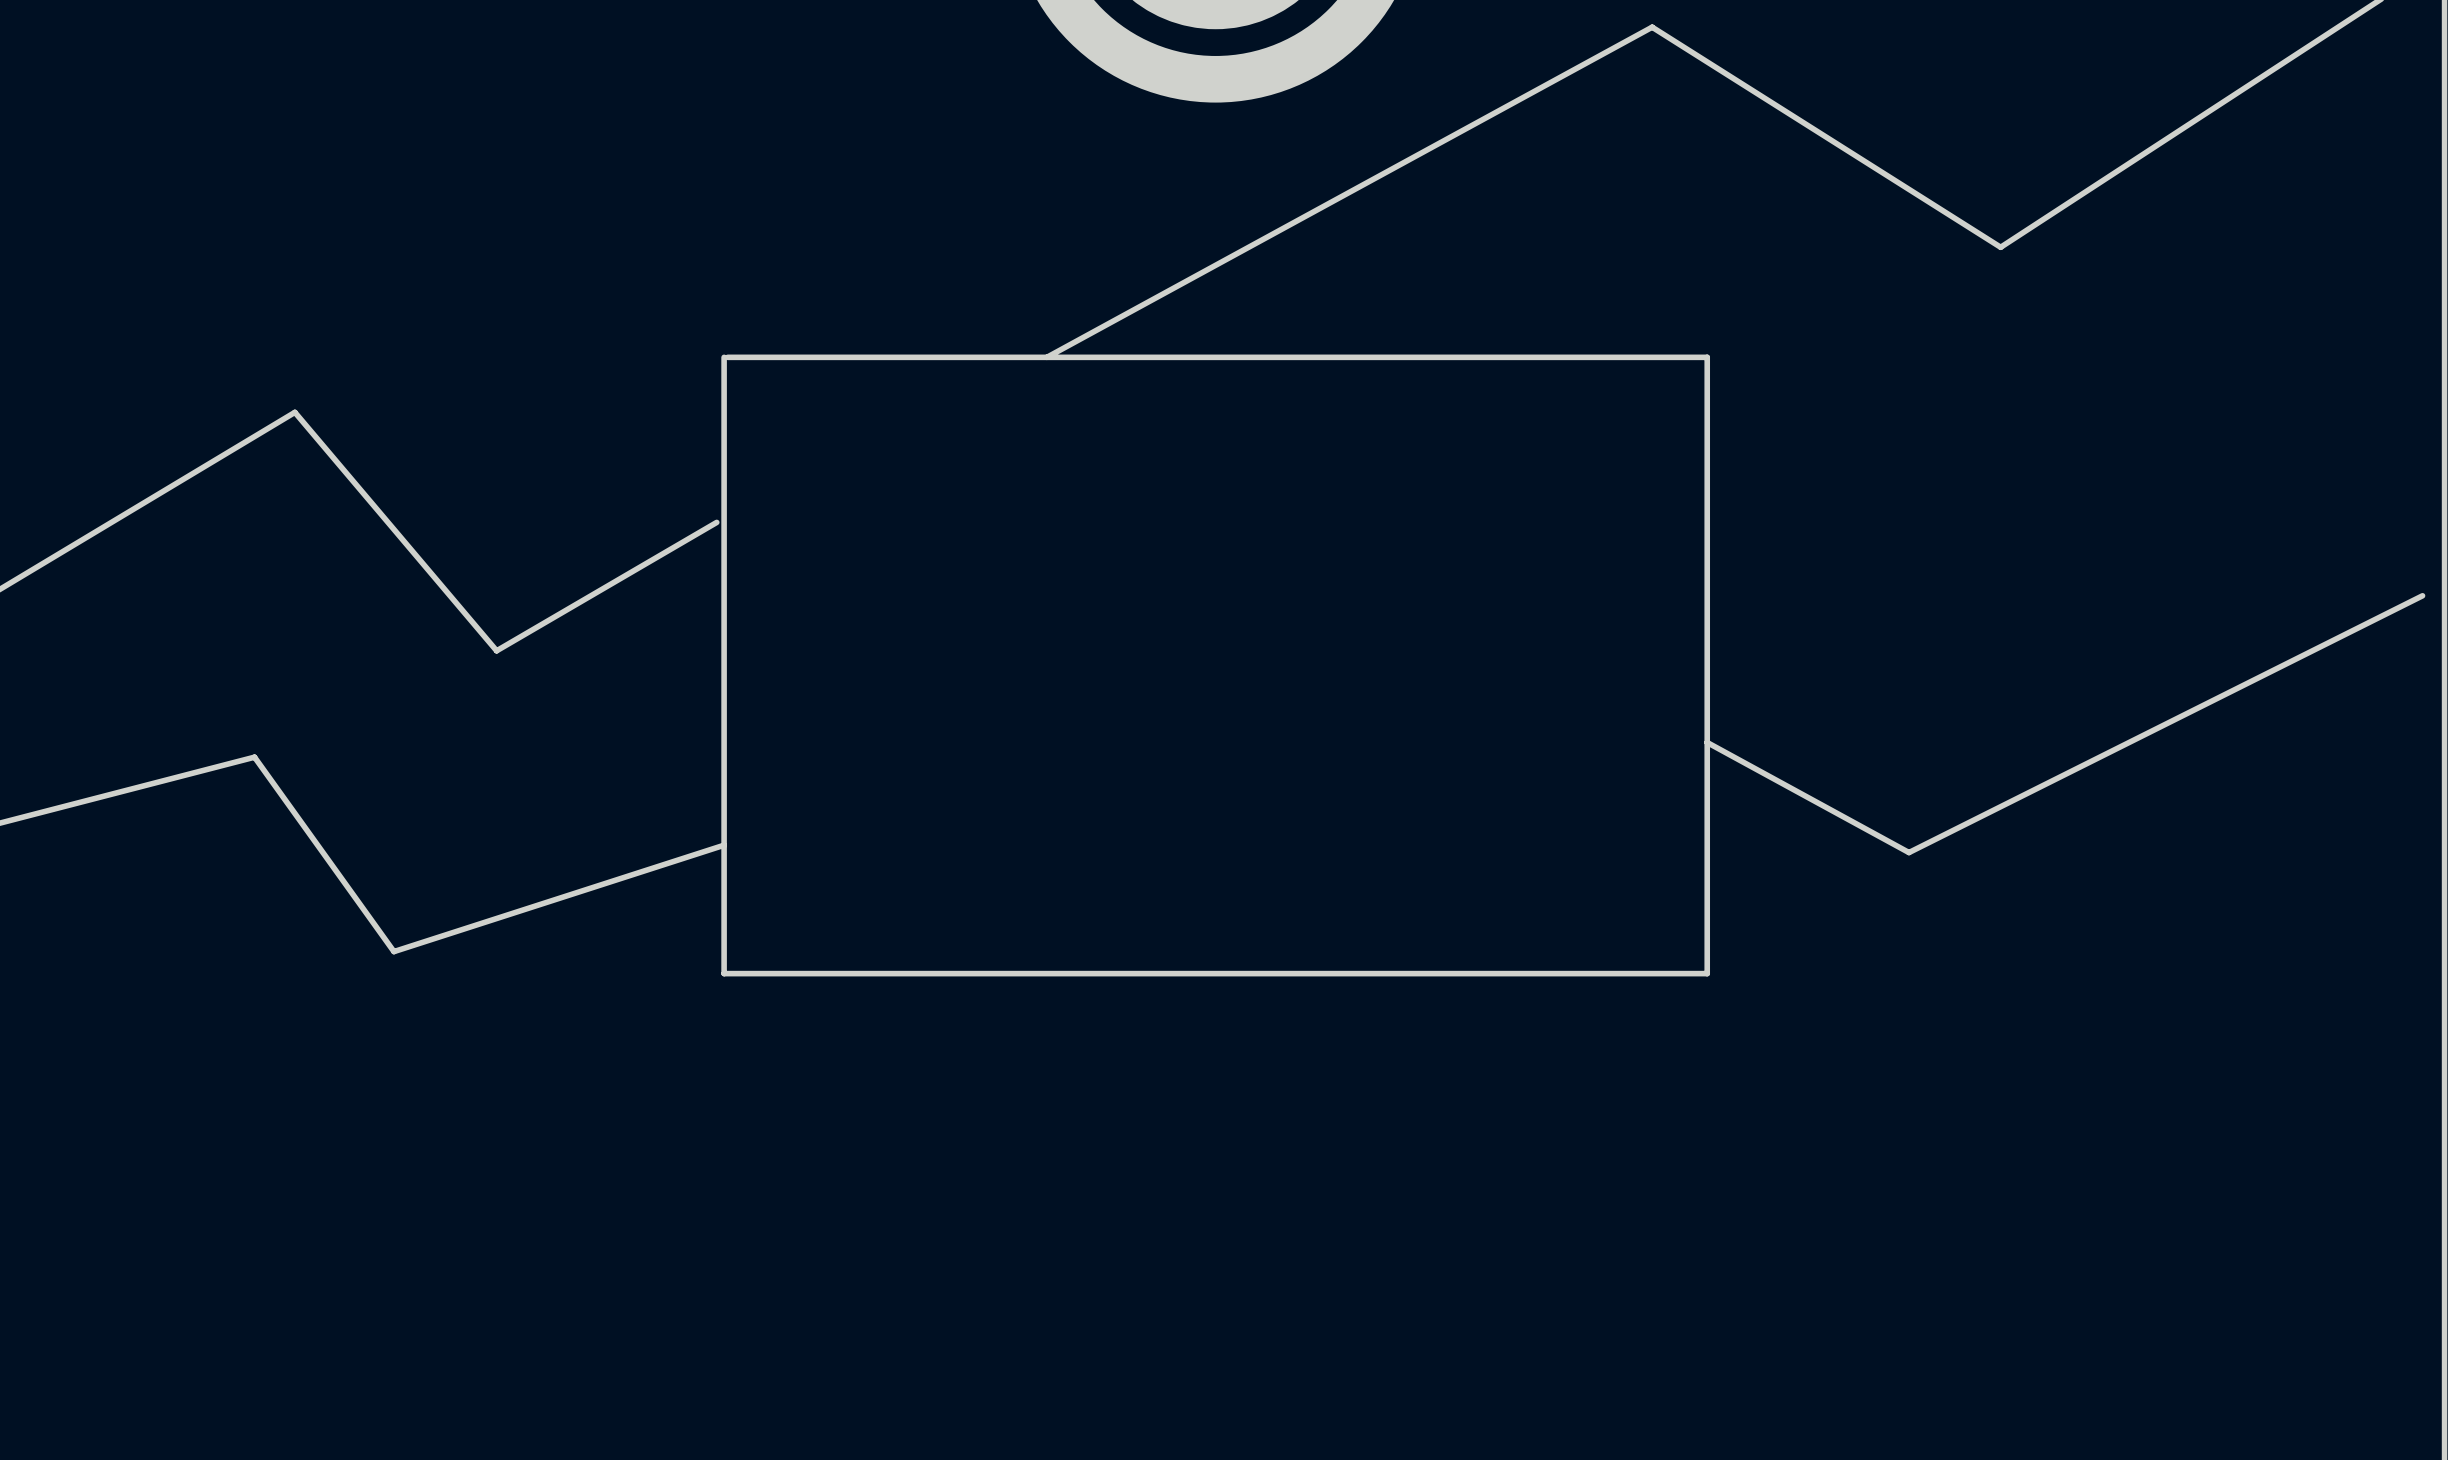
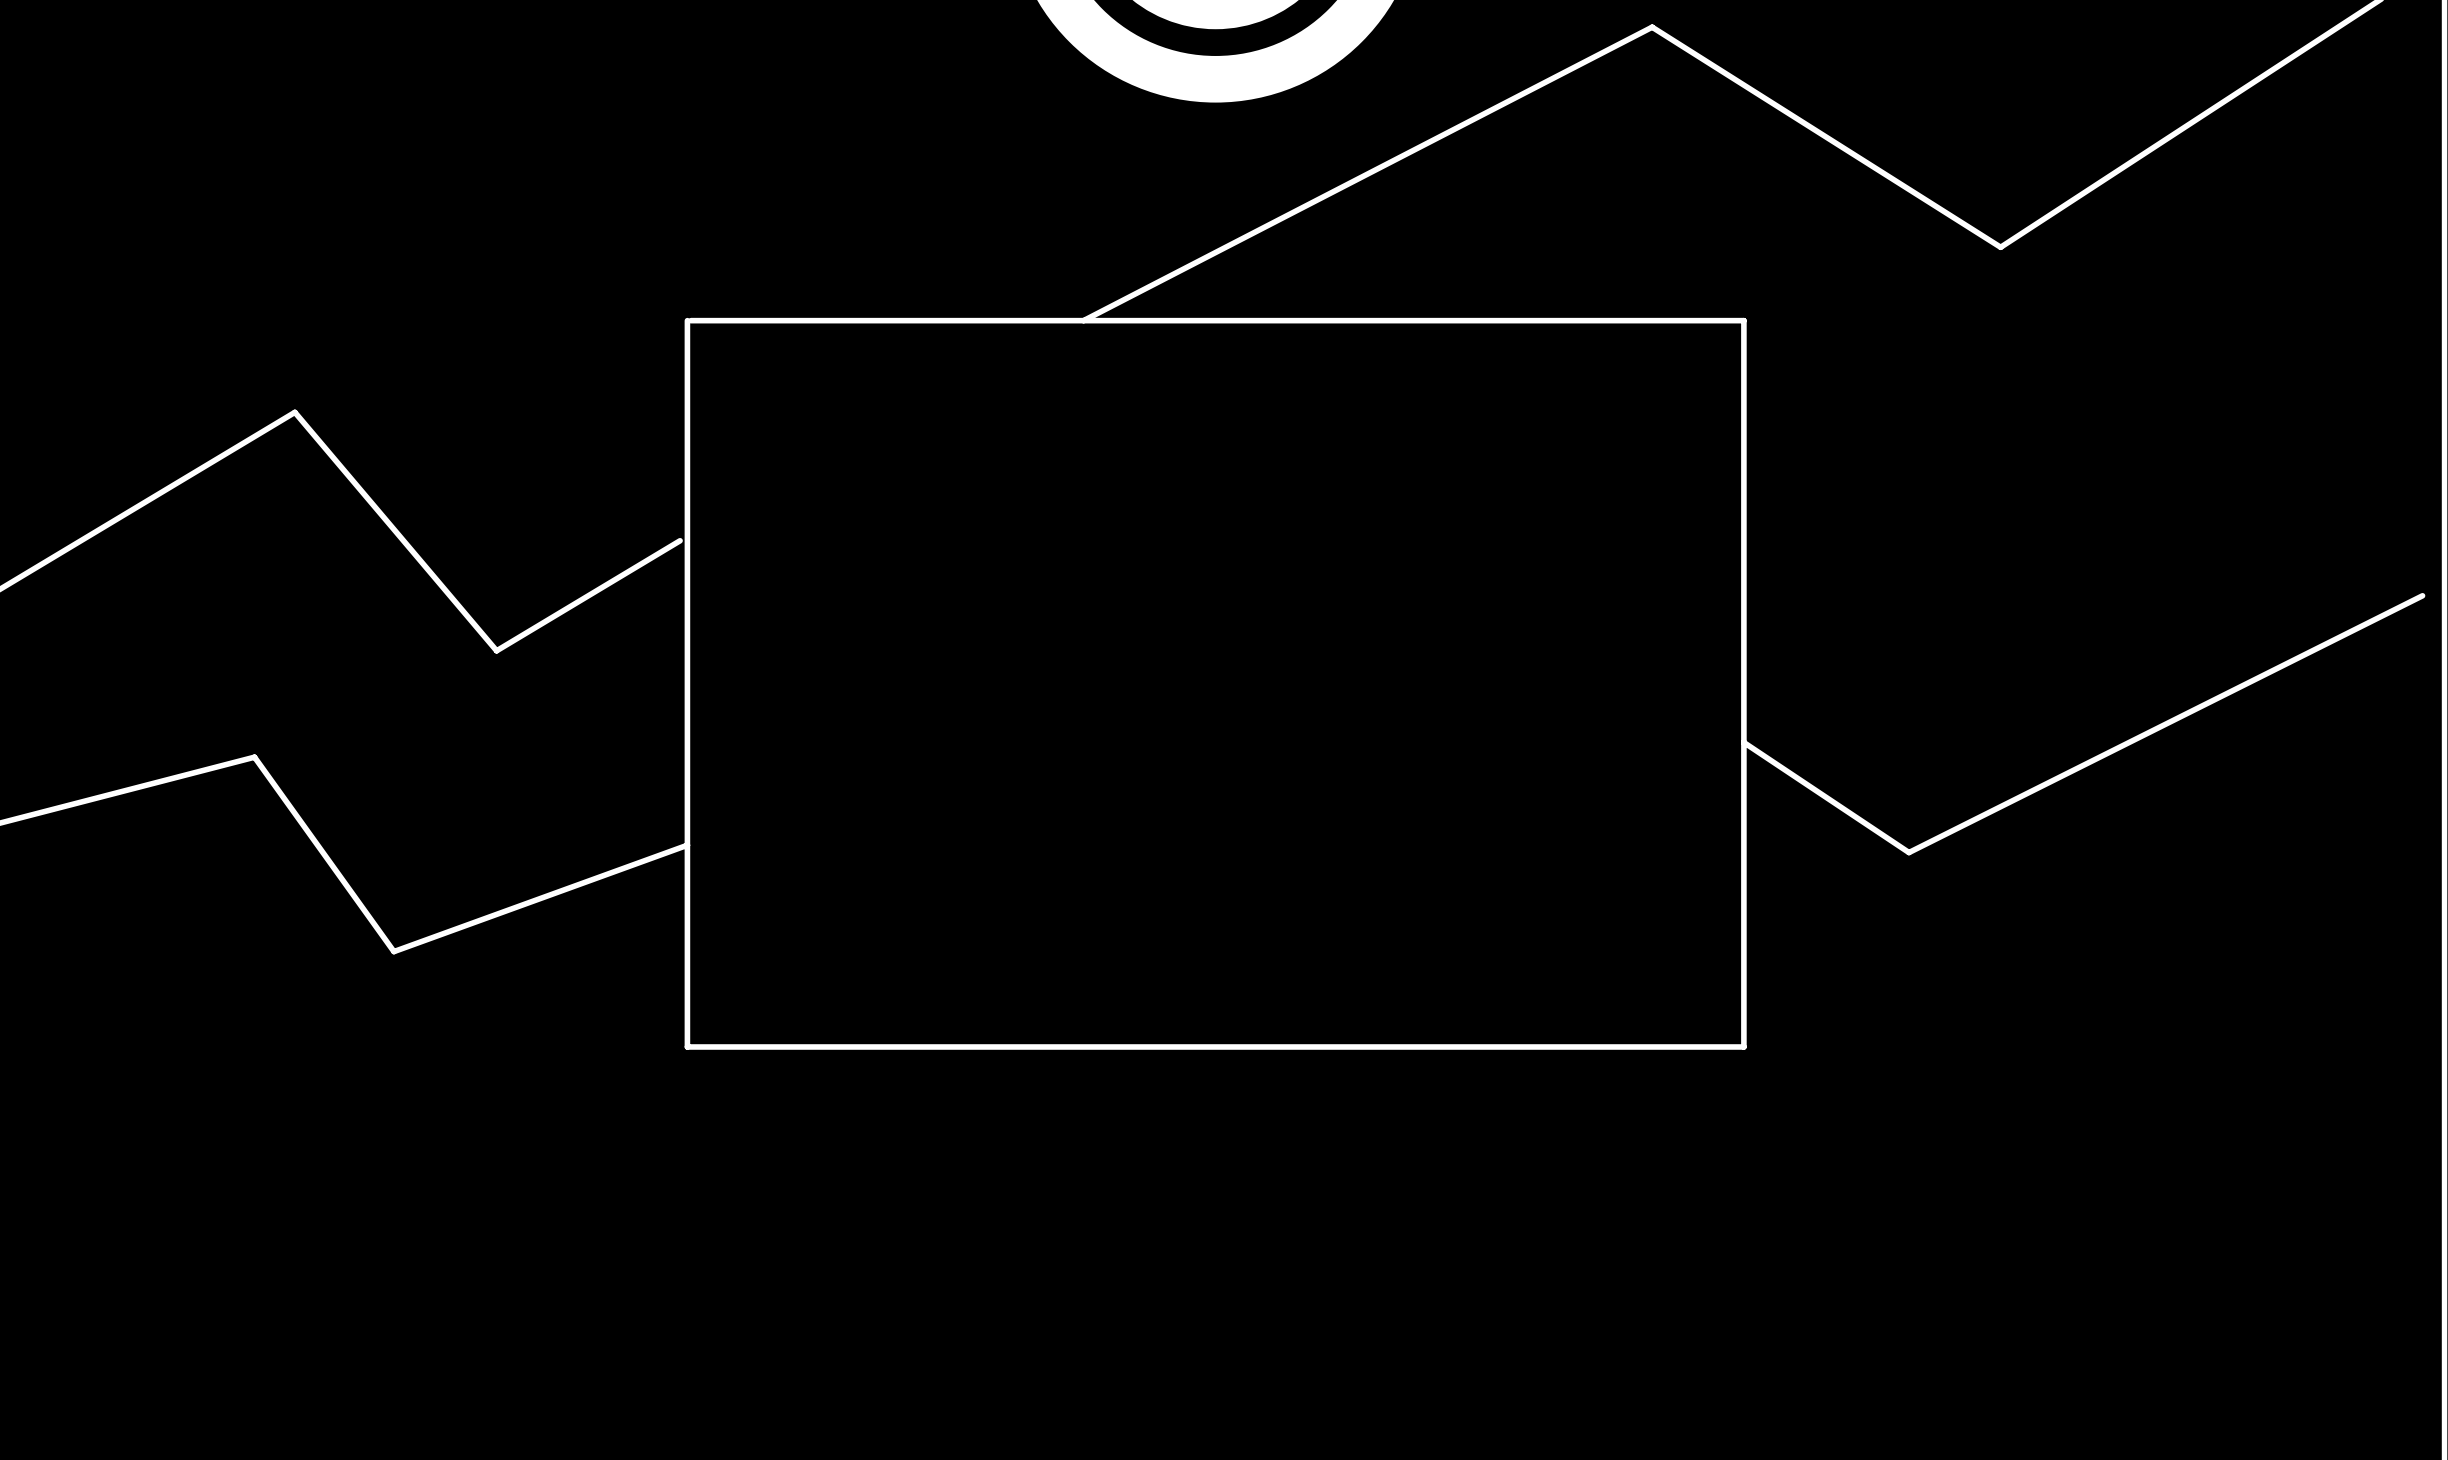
board edge: (1652, 27) (1046, 357) -> (1652, 27) (1083, 320)
board edge: none -> (687, 320) (687, 1046) (1743, 1046) (1743, 320) (691, 320)
board edge: (724, 357) (724, 973) (1707, 973) (1707, 357) (727, 357) -> none
board edge: (716, 522) (496, 650) -> (680, 540) (496, 650)
board edge: (1707, 742) (1908, 852) -> (1743, 742) (1908, 852)
board edge: (724, 845) (393, 951) -> (687, 845) (393, 951)

